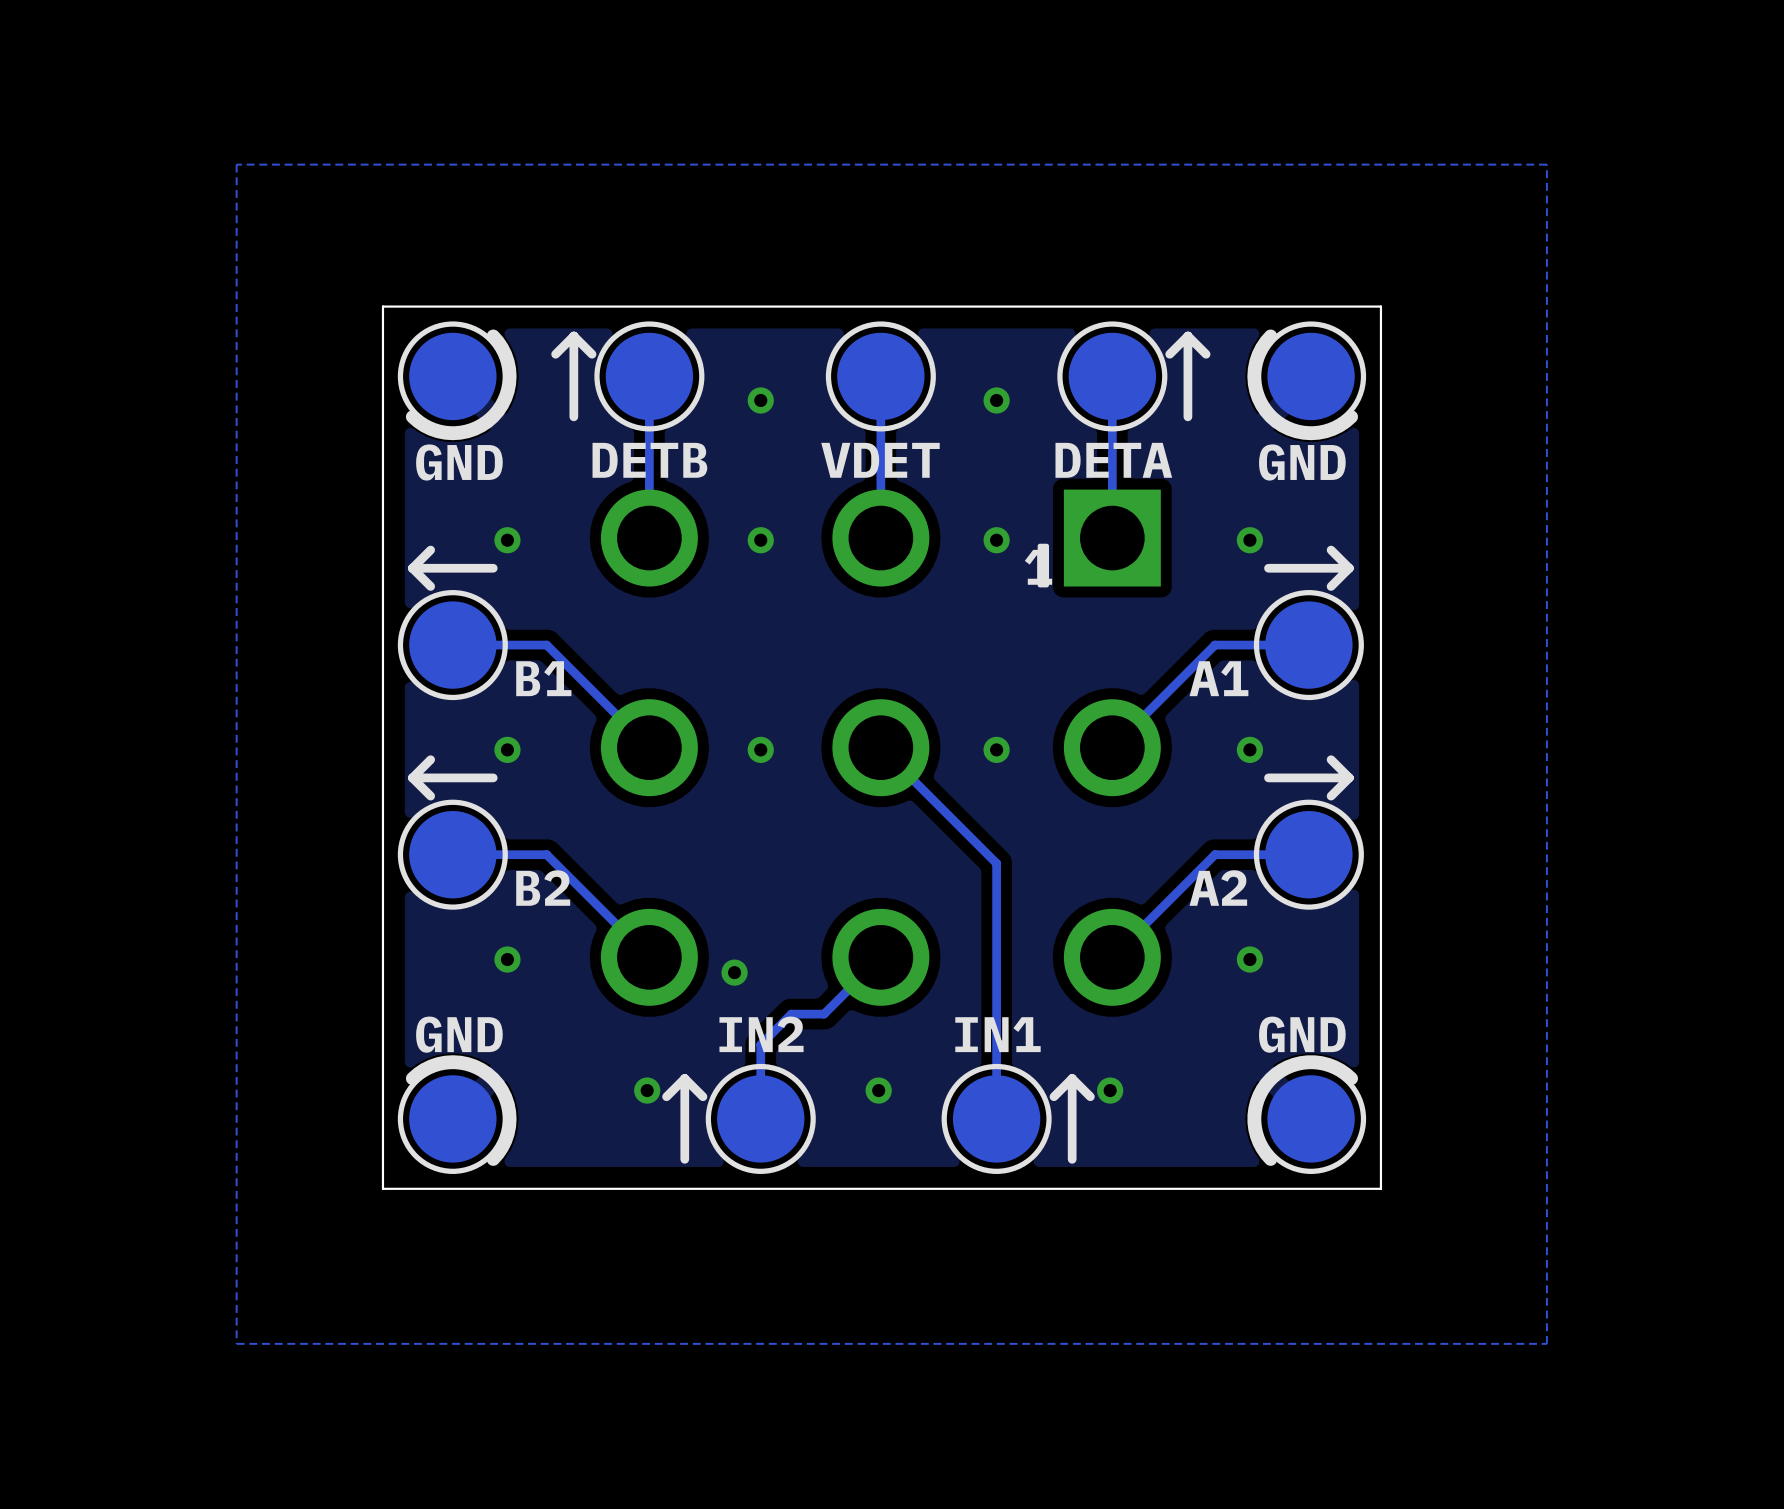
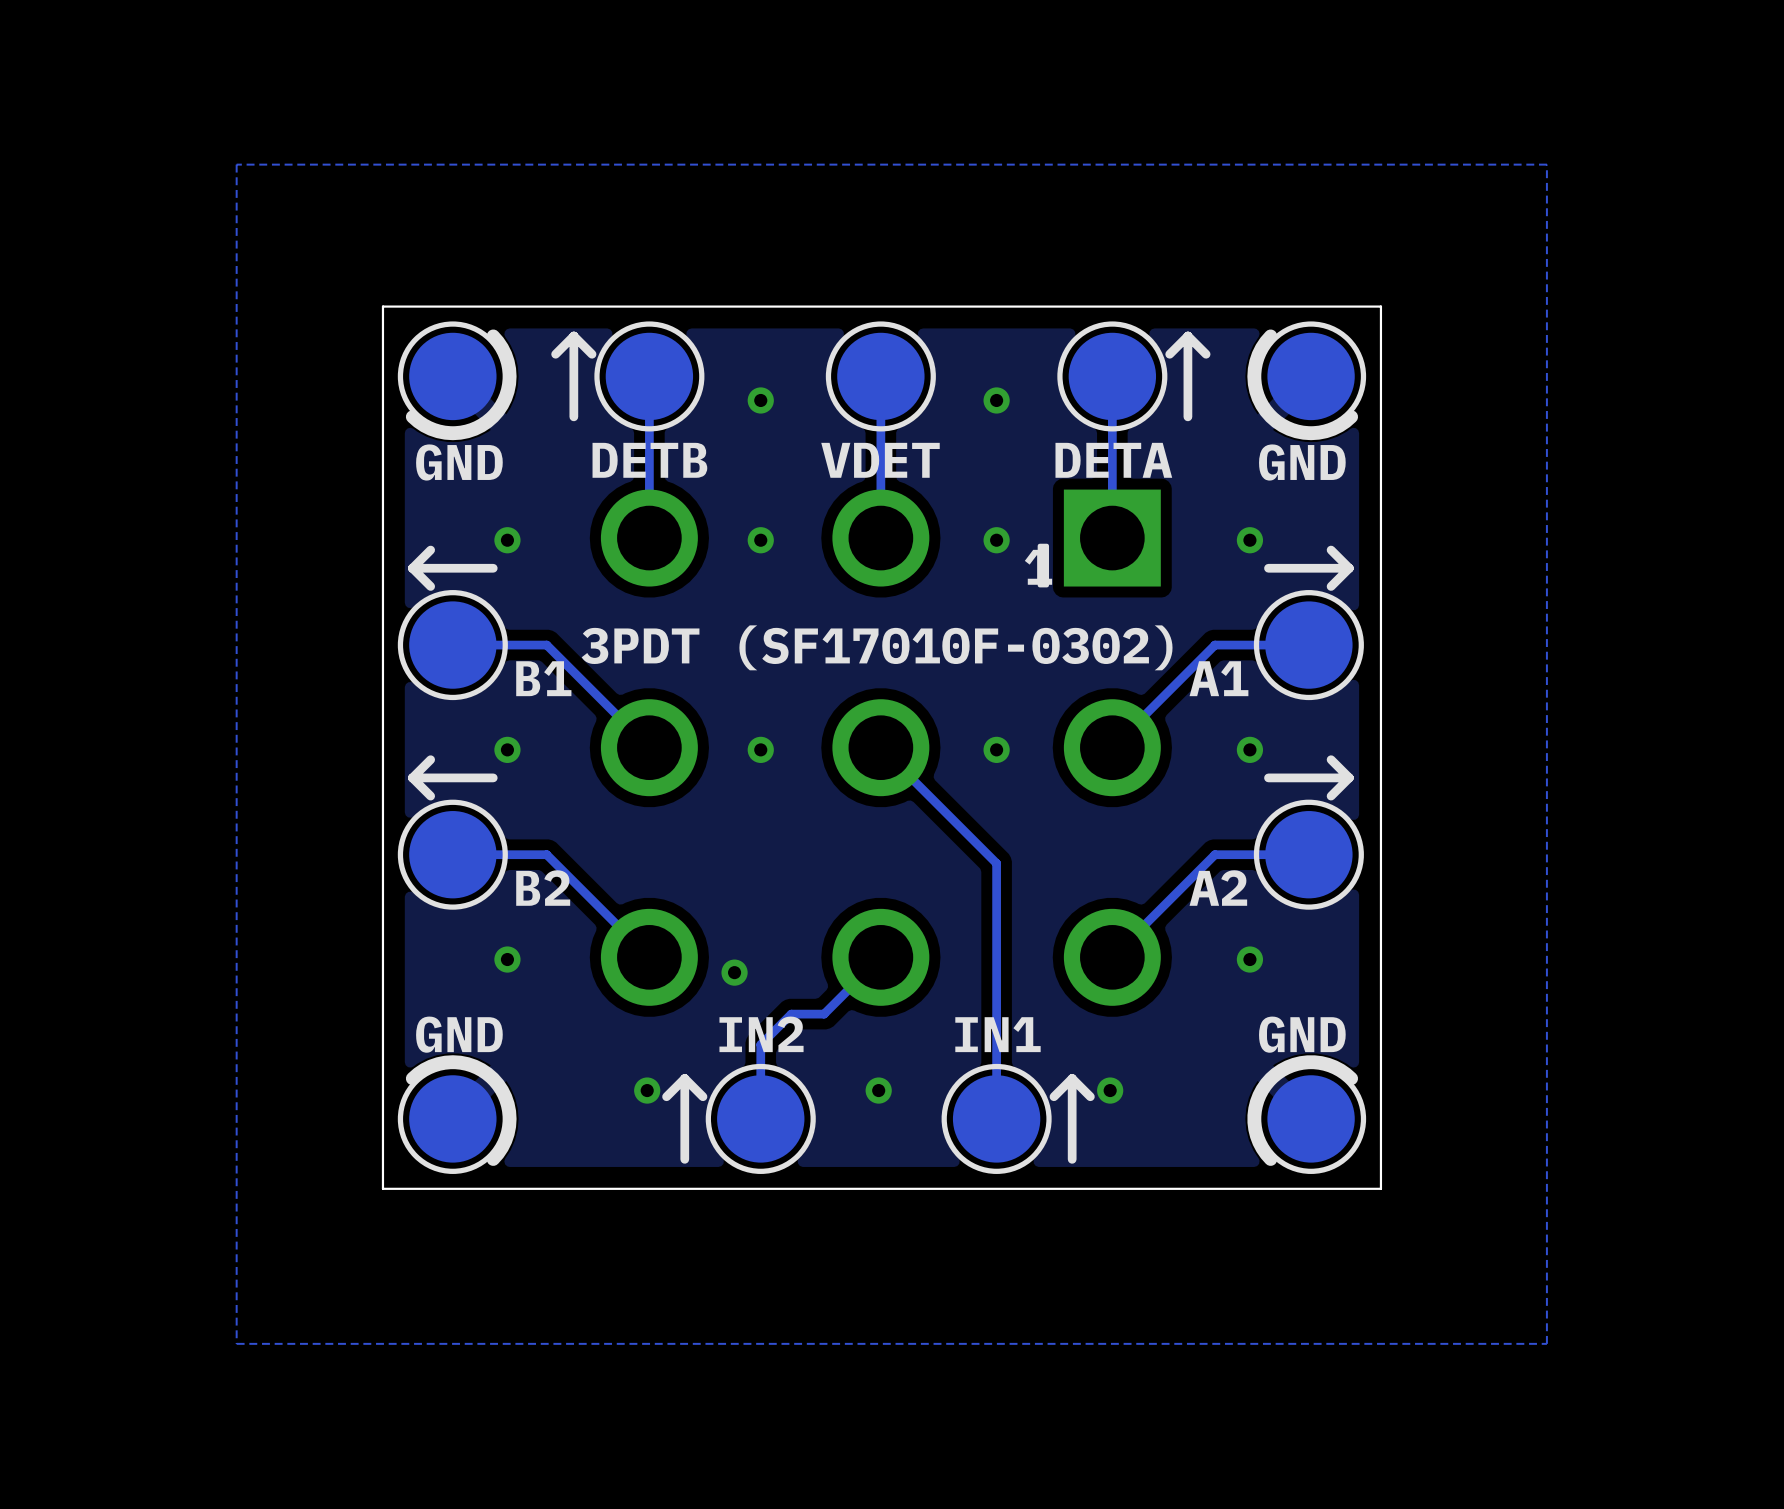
text: none -> 3PDT (SF17010F-0302) (877, 647)

